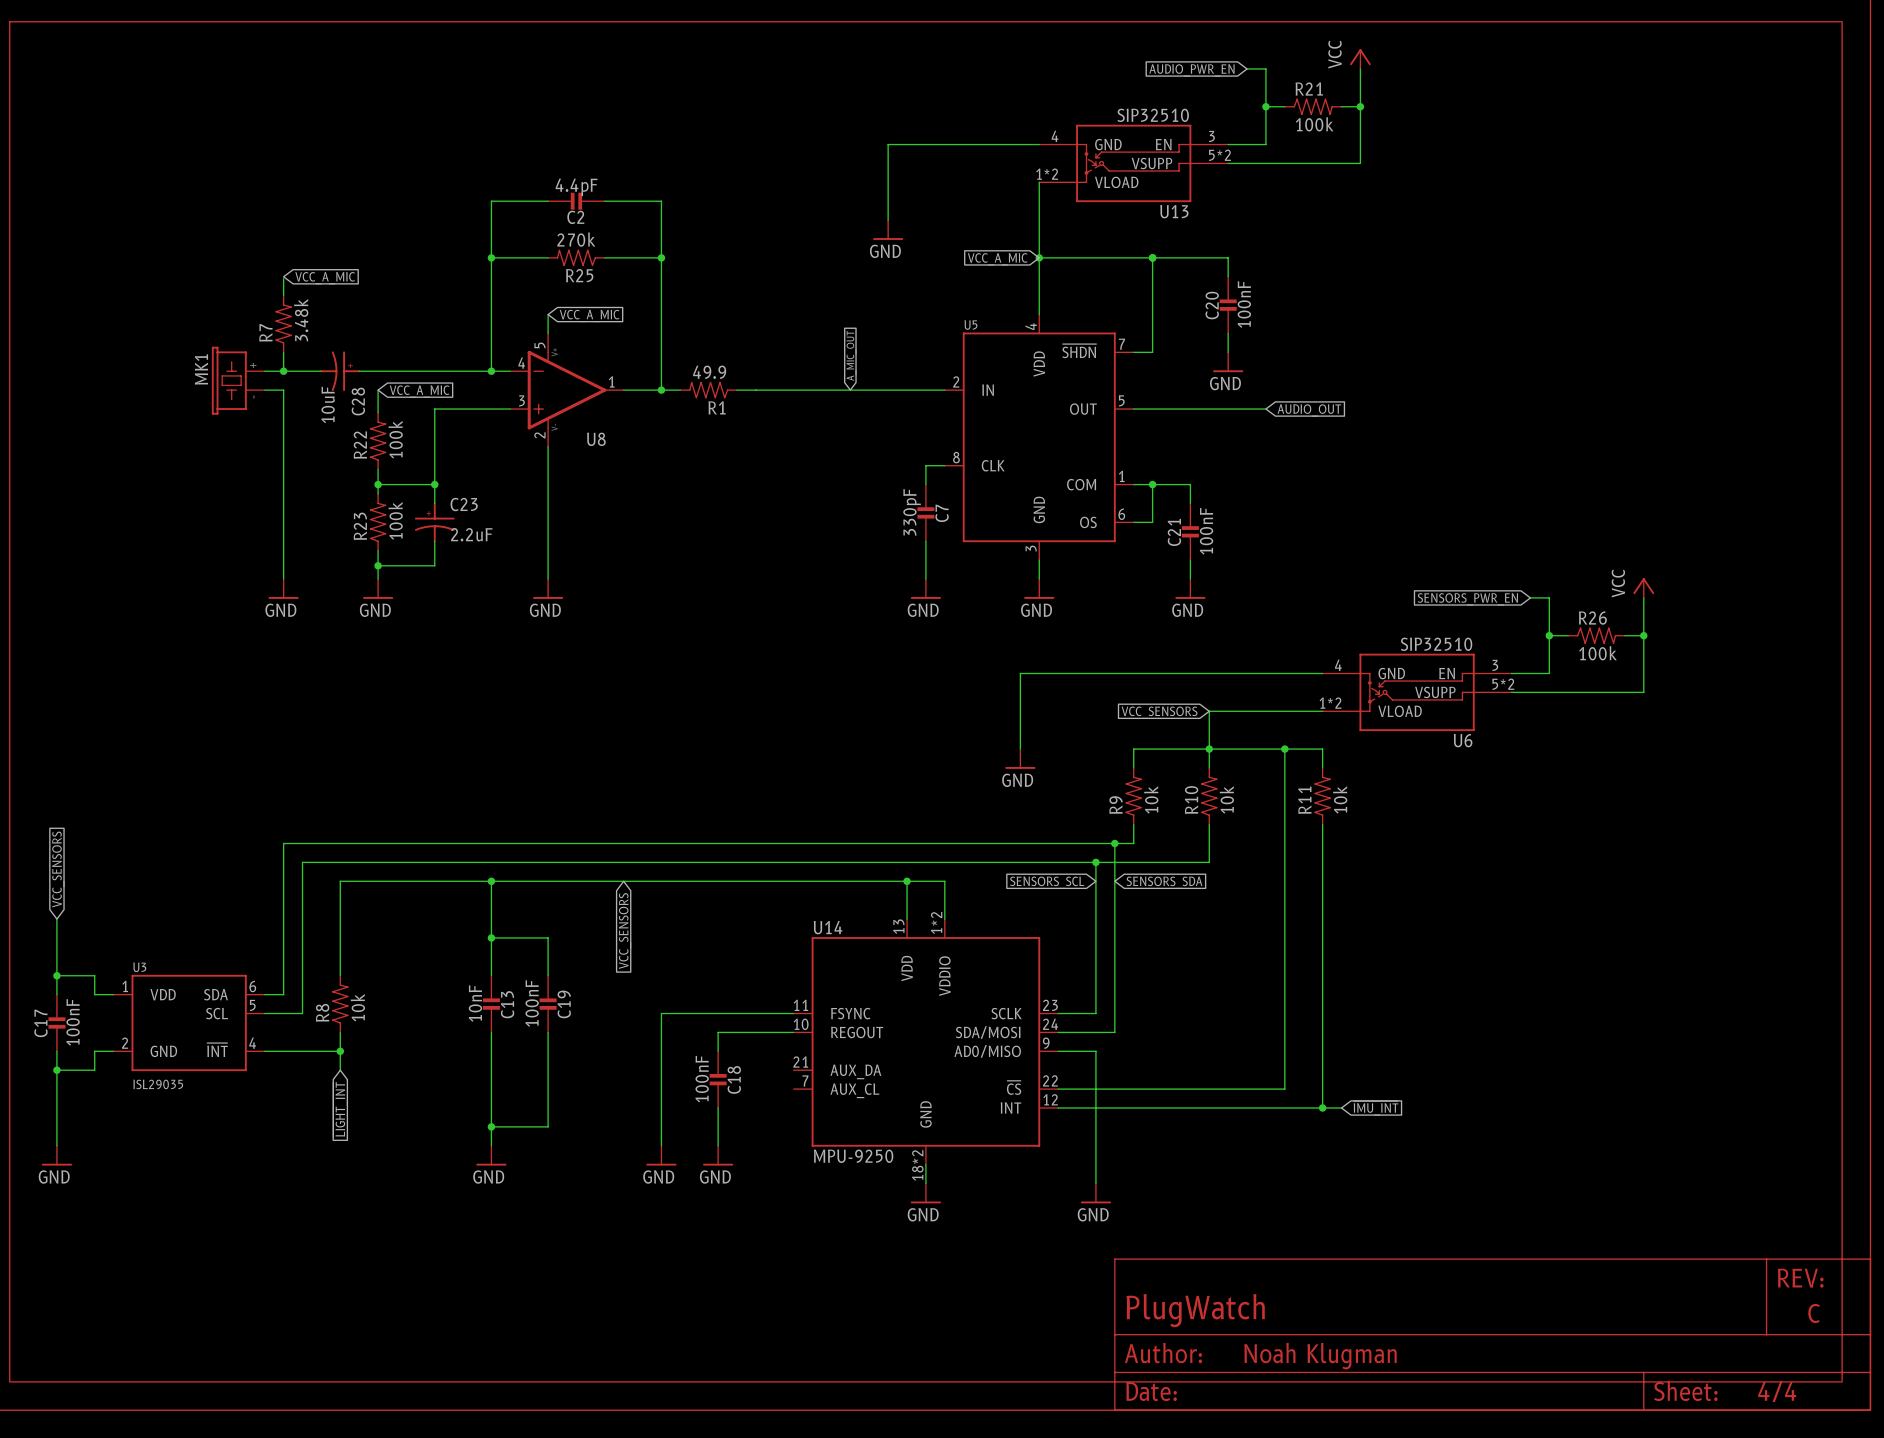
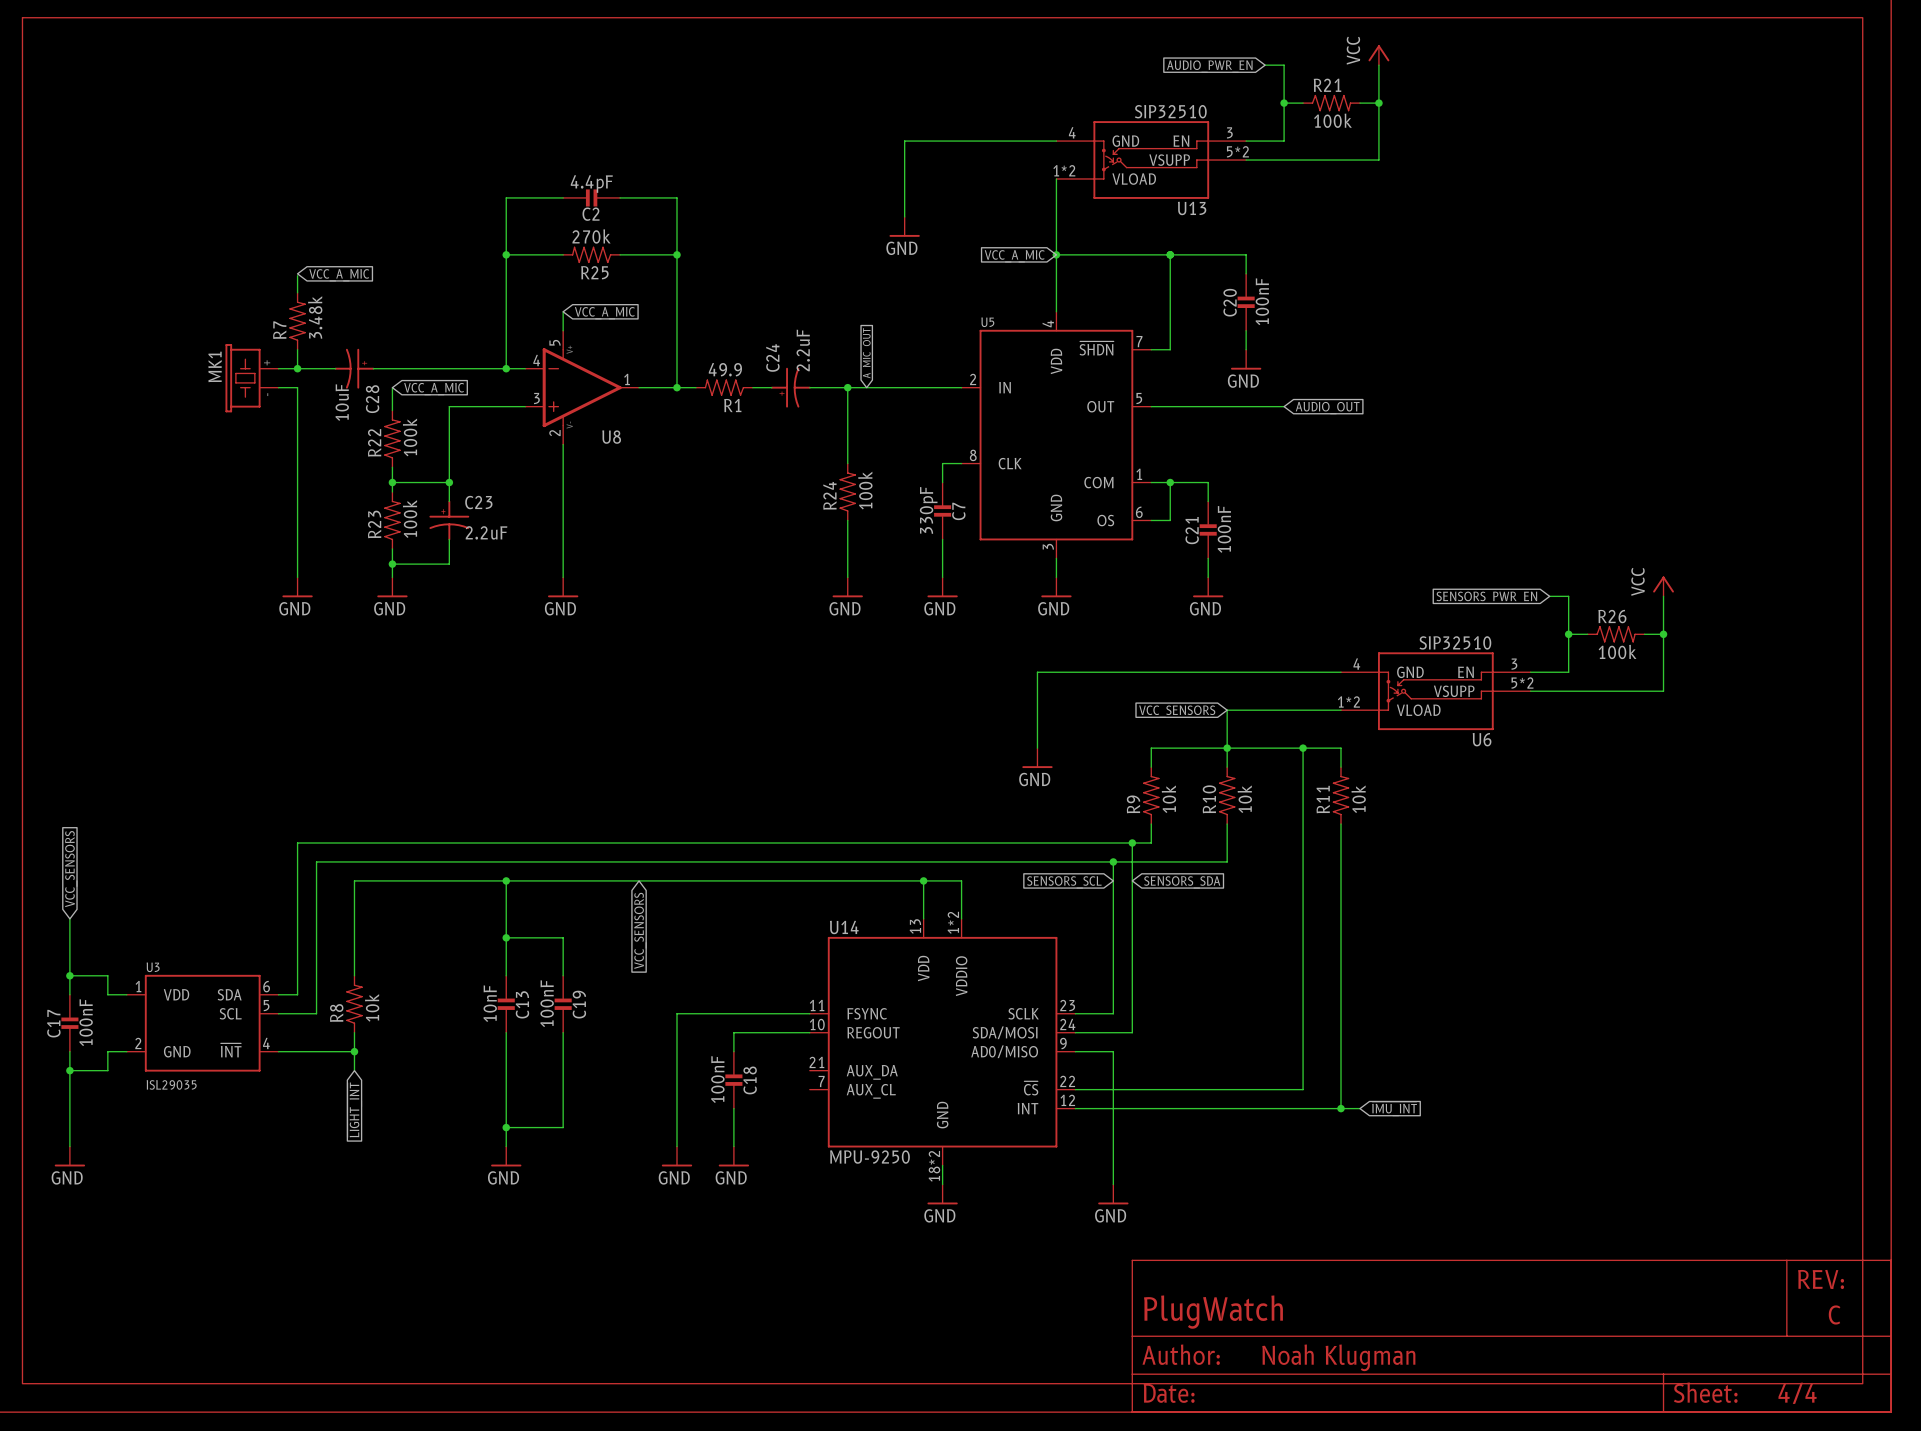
C24: none -> 2.2uF (790, 387)
wire: none -> (847, 387) (847, 463)
junction: none -> (847, 387)
R24: none -> 100k (847, 492)
wire: none -> (847, 520) (847, 577)
power symbol: none -> GND (847, 587)

